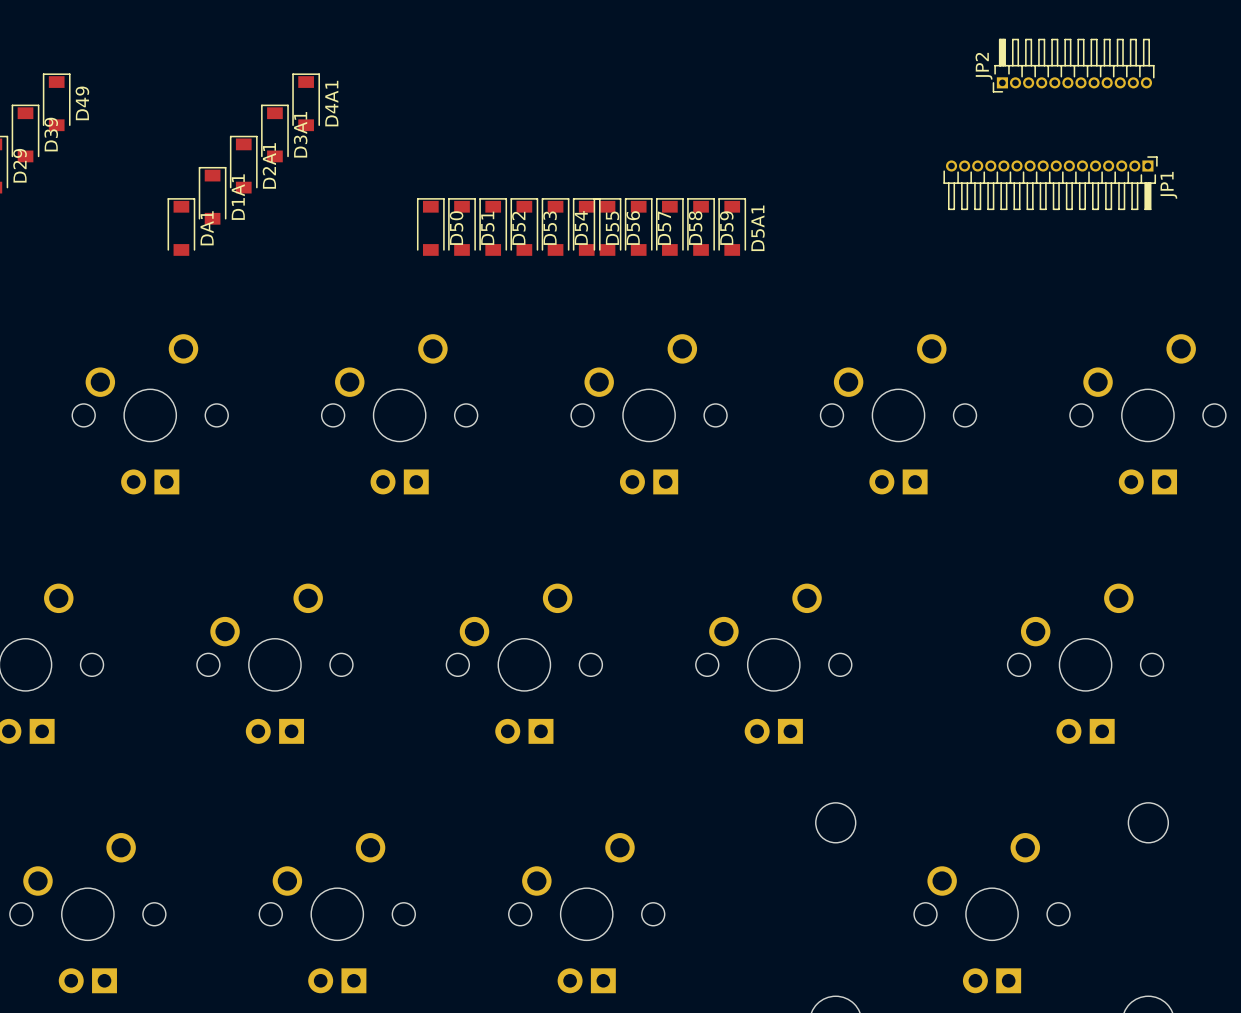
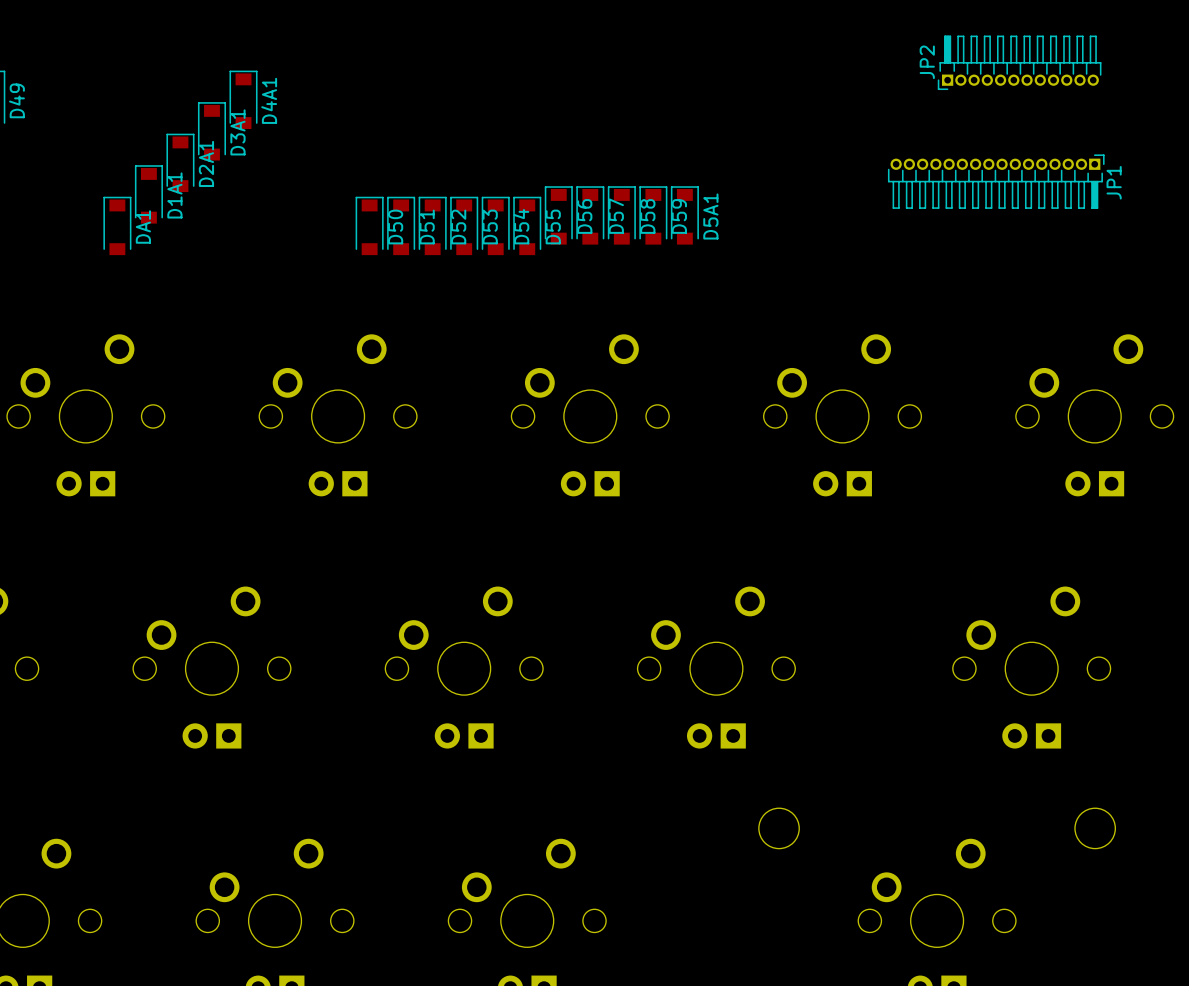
D56 position: (607, 226) -> (558, 215)
D57 position: (638, 226) -> (590, 215)
D58 position: (669, 226) -> (621, 215)
D59 position: (701, 226) -> (653, 215)
D5A1 position: (732, 226) -> (684, 215)

